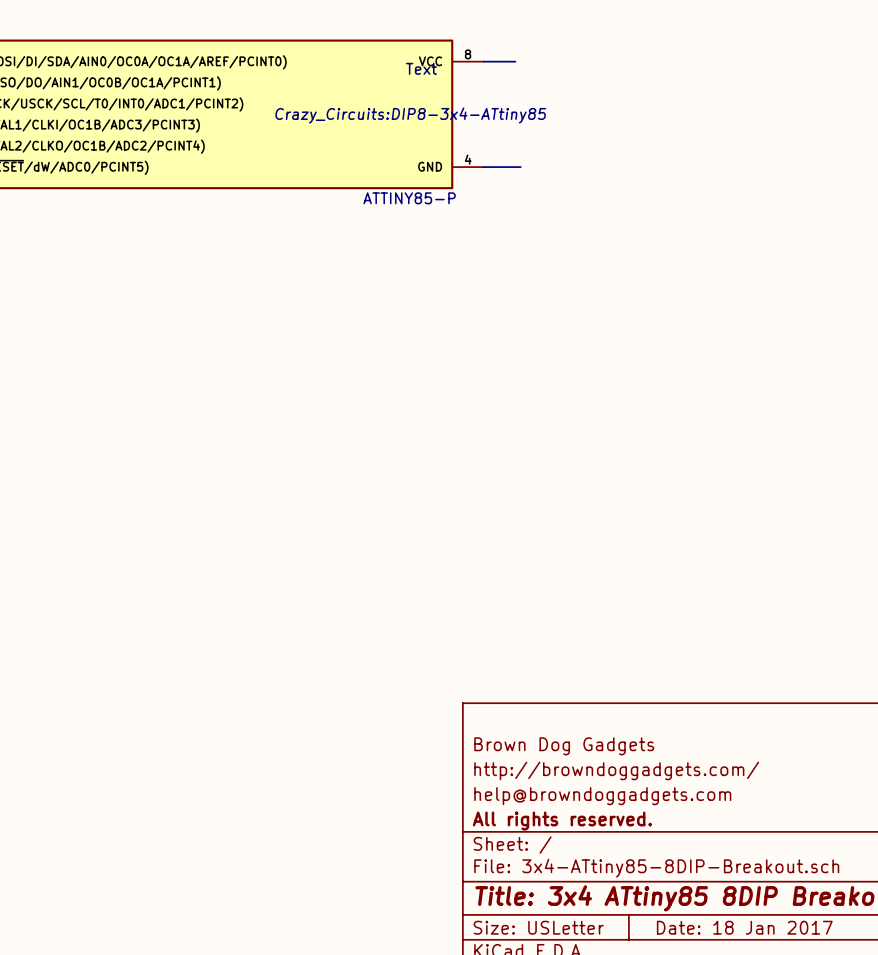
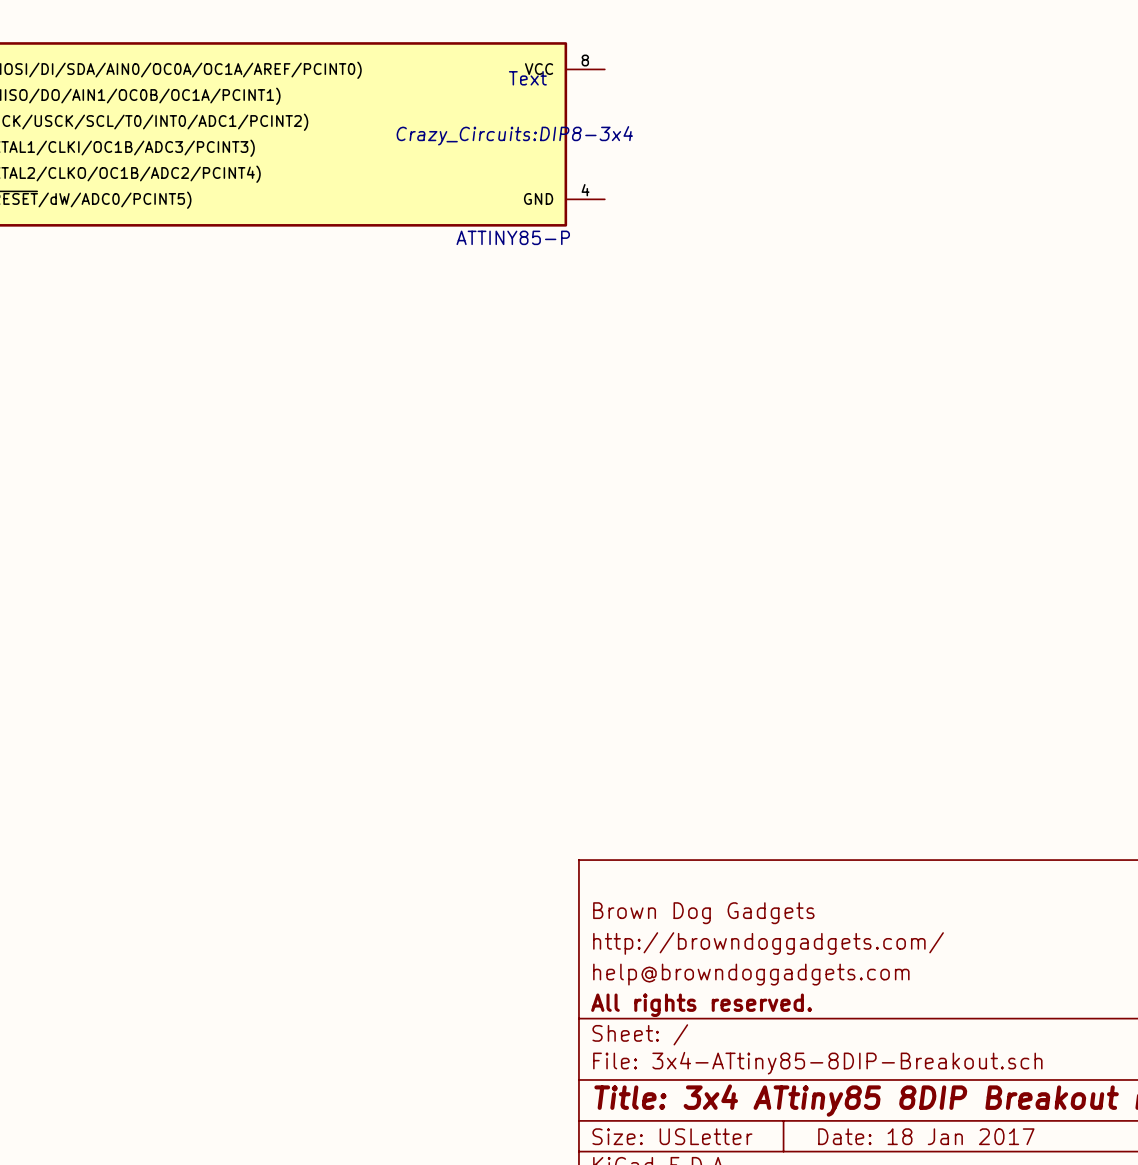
wire: (483, 61) (515, 61) -> none
part text: Crazy_Circuits:DIP8-3x4-ATtiny85 (410, 115) -> Crazy_Circuits:DIP8-3x4 (514, 135)
wire: (483, 167) (520, 167) -> none

